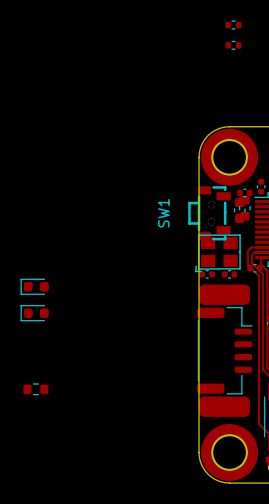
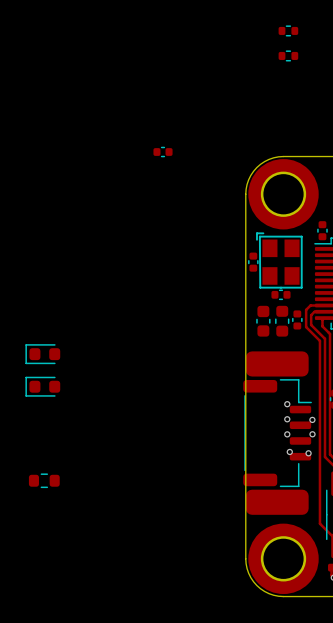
part: none -> (163, 152)
part: (244, 192) -> none
part position: (244, 208) -> (282, 321)
part position: (239, 210) -> (263, 321)
part: none -> (253, 262)
SW1: (209, 213) -> none
part: none -> (280, 294)
part rotation: 0° (218, 253) -> 90° clockwise (279, 260)
part position: (218, 253) -> (279, 260)
part: none -> (297, 319)
part: (255, 268) -> none
part: (207, 274) -> none
part: (229, 274) -> none
via: none -> (287, 404)
via: none -> (287, 419)
via: none -> (312, 419)
via: none -> (287, 434)
via: none -> (312, 434)
via: none -> (289, 451)
via: none -> (308, 453)

